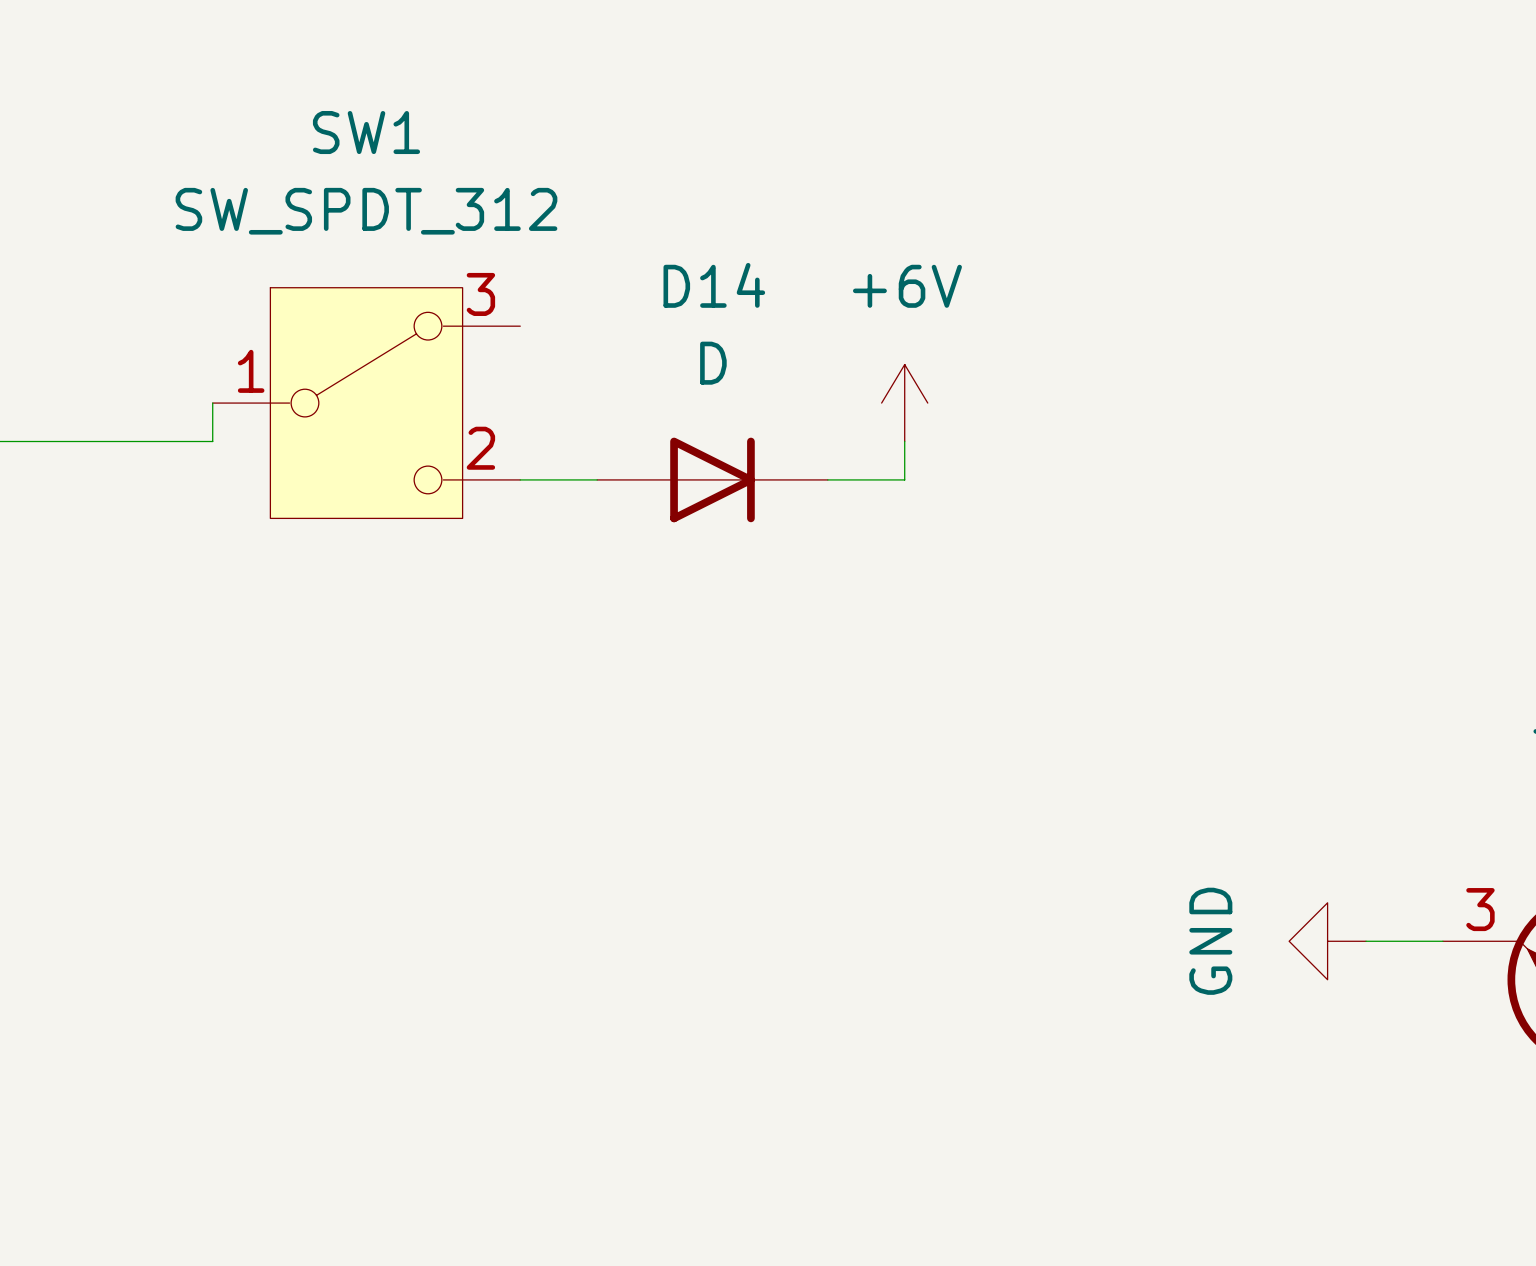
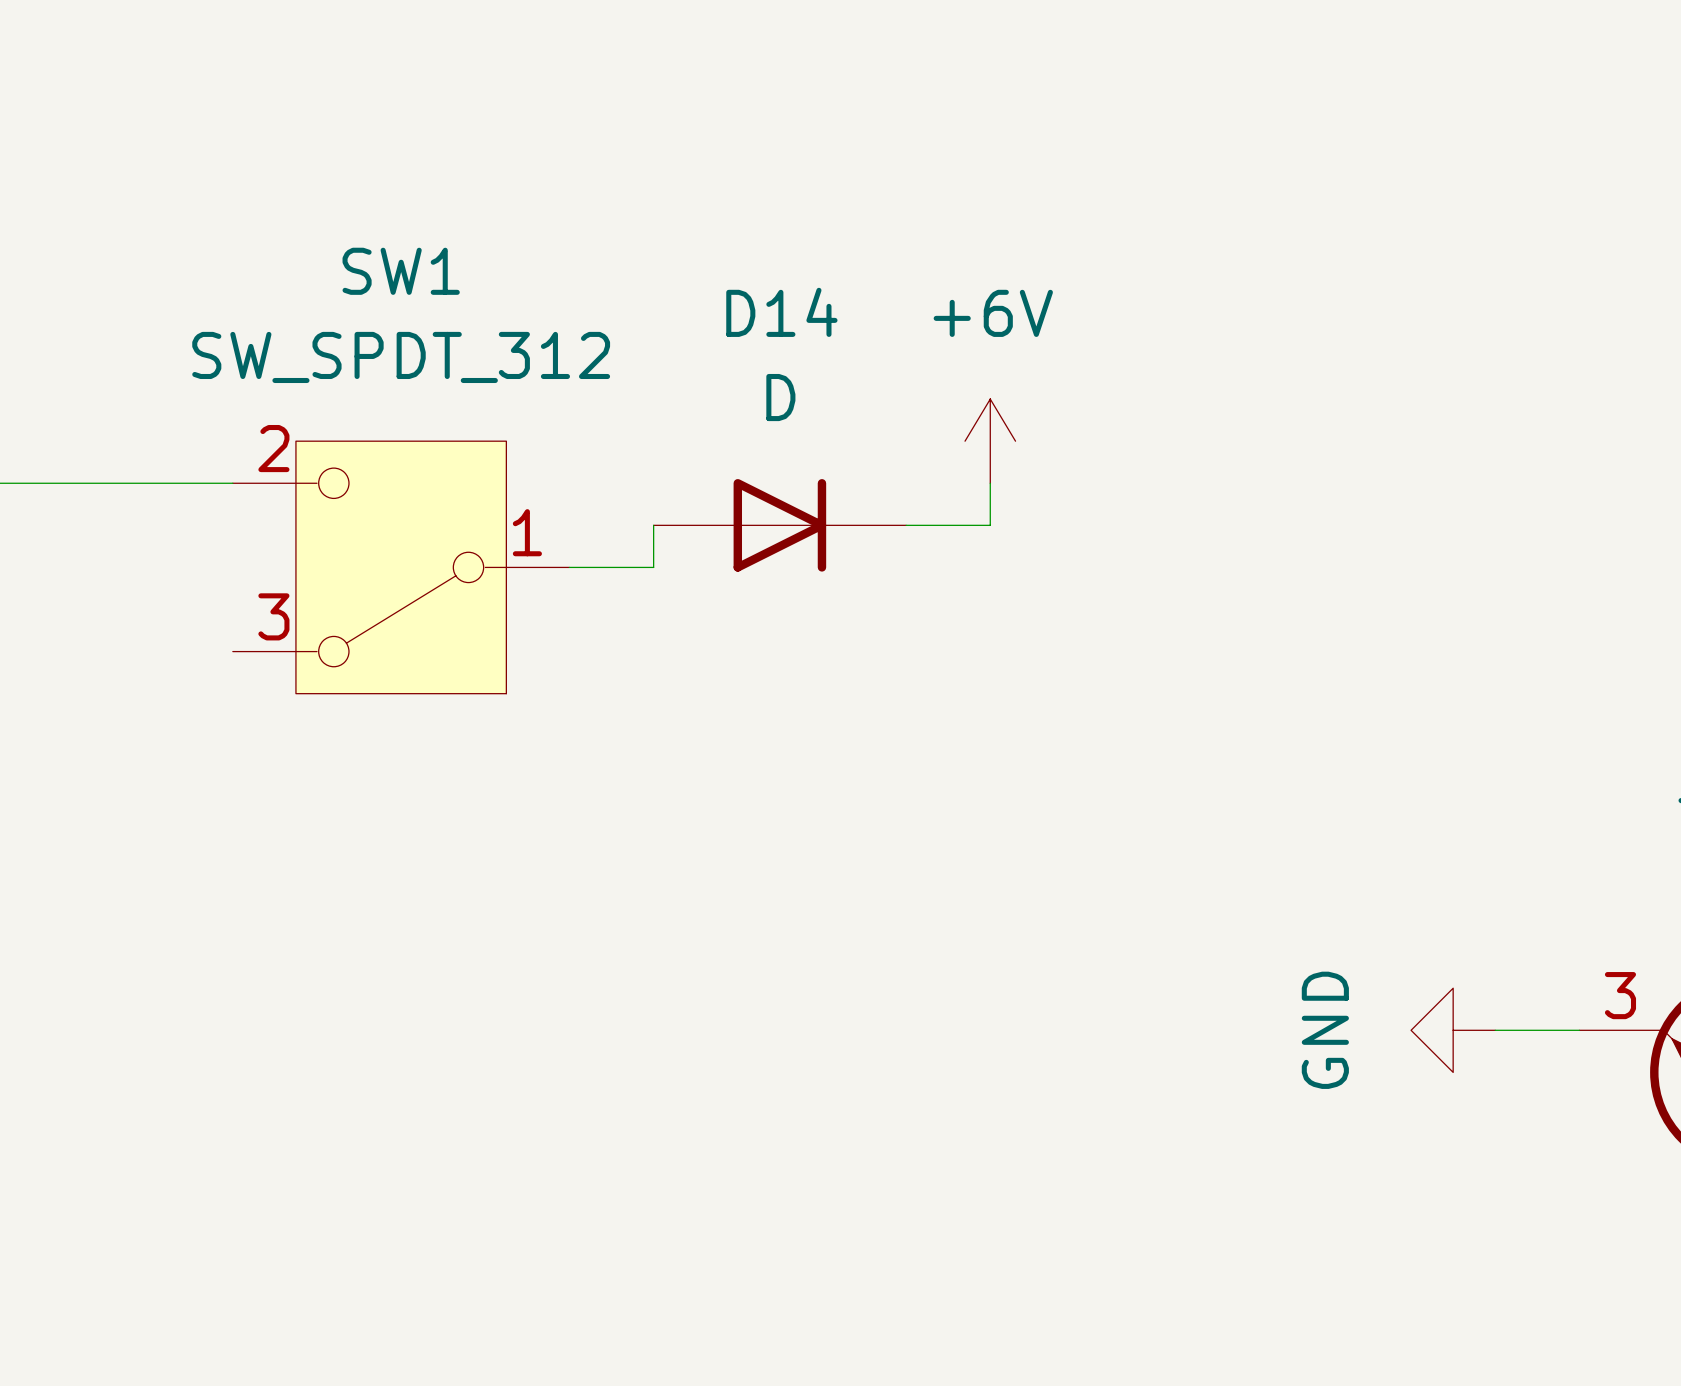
wire: (212, 403) (212, 441) -> none
SW1 rotation: 0° (366, 403) -> 180° (401, 567)
wire: (520, 479) (597, 479) -> (569, 567) (653, 567) (653, 525)

